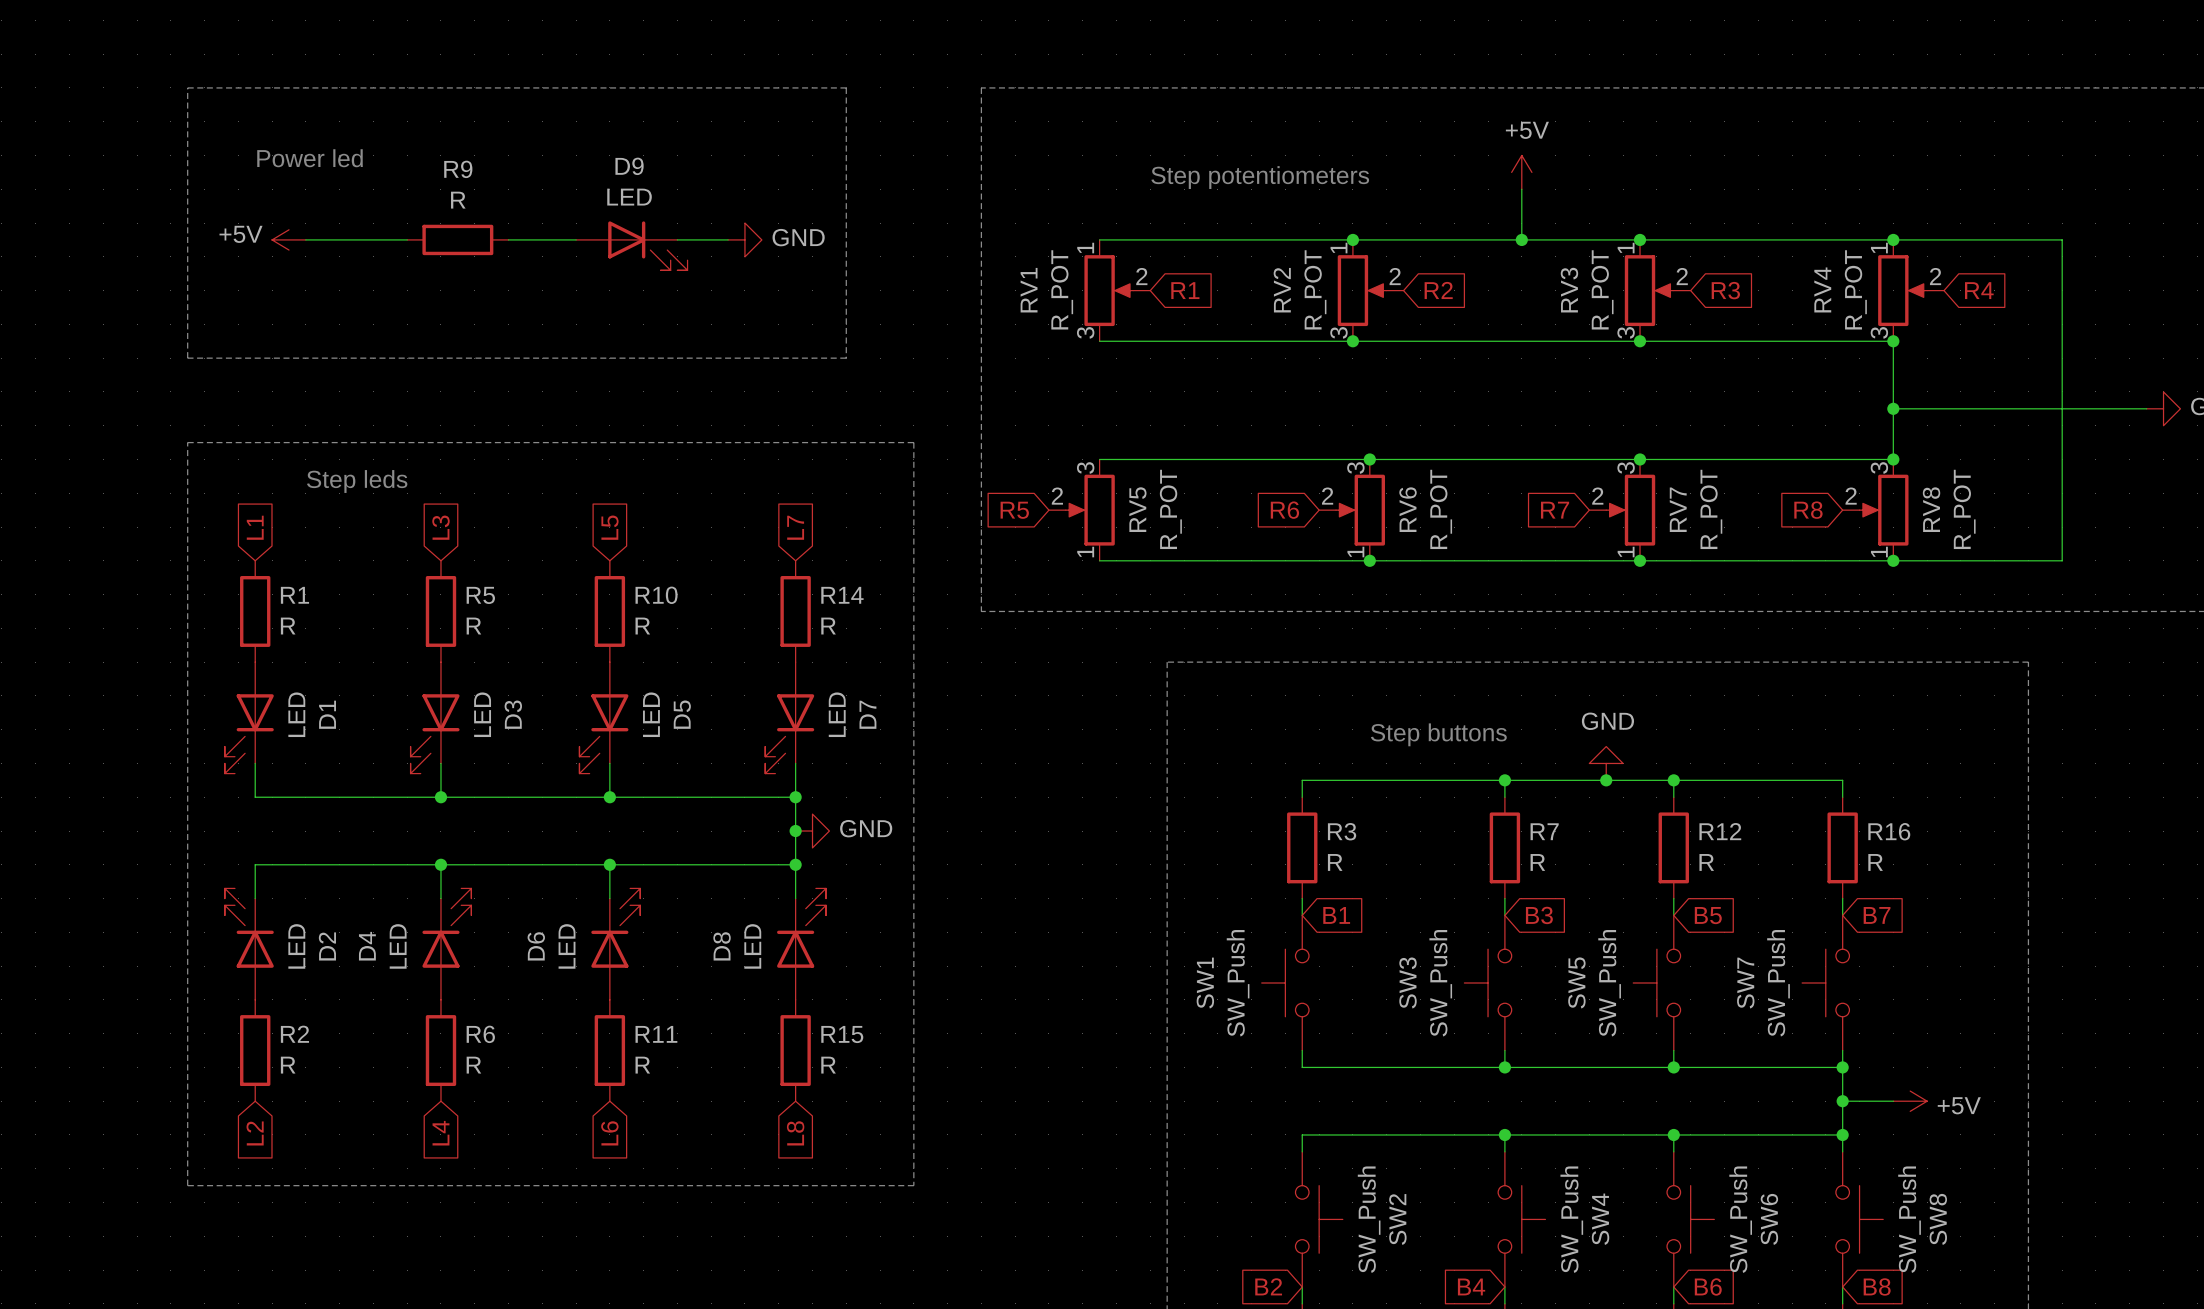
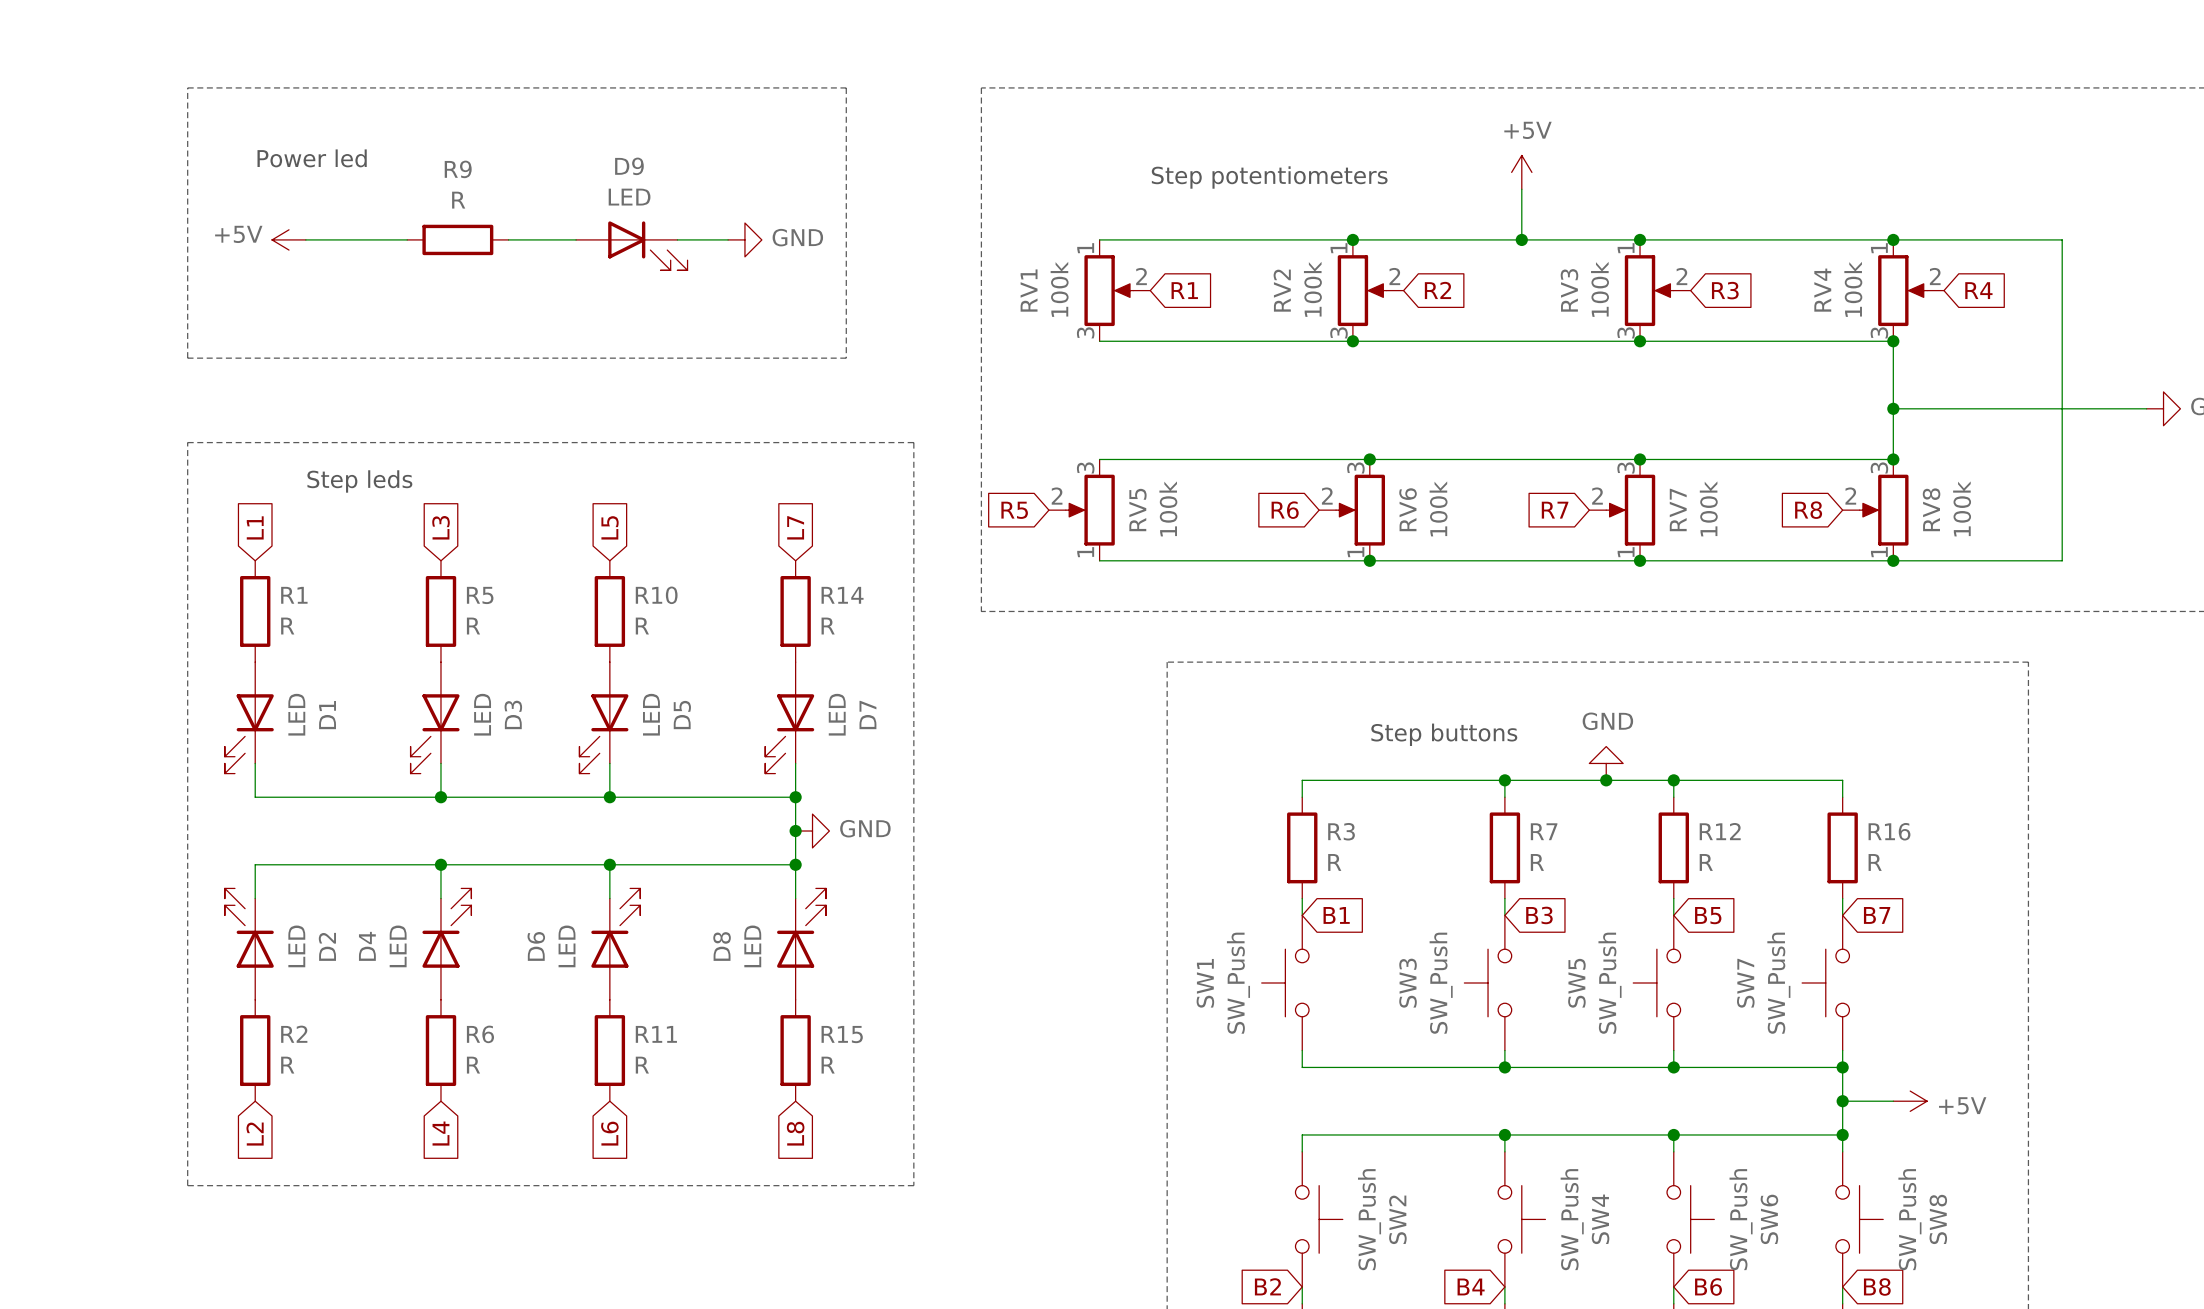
RV1 value: R_POT (1062, 289) -> 100k (1059, 289)
RV2 value: R_POT (1315, 289) -> 100k (1312, 289)
RV3 value: R_POT (1602, 289) -> 100k (1600, 289)
RV4 value: R_POT (1855, 289) -> 100k (1853, 289)
RV5 value: R_POT (1170, 509) -> 100k (1168, 508)
RV6 value: R_POT (1441, 509) -> 100k (1438, 508)
RV7 value: R_POT (1711, 509) -> 100k (1708, 508)
RV8 value: R_POT (1964, 509) -> 100k (1962, 508)

